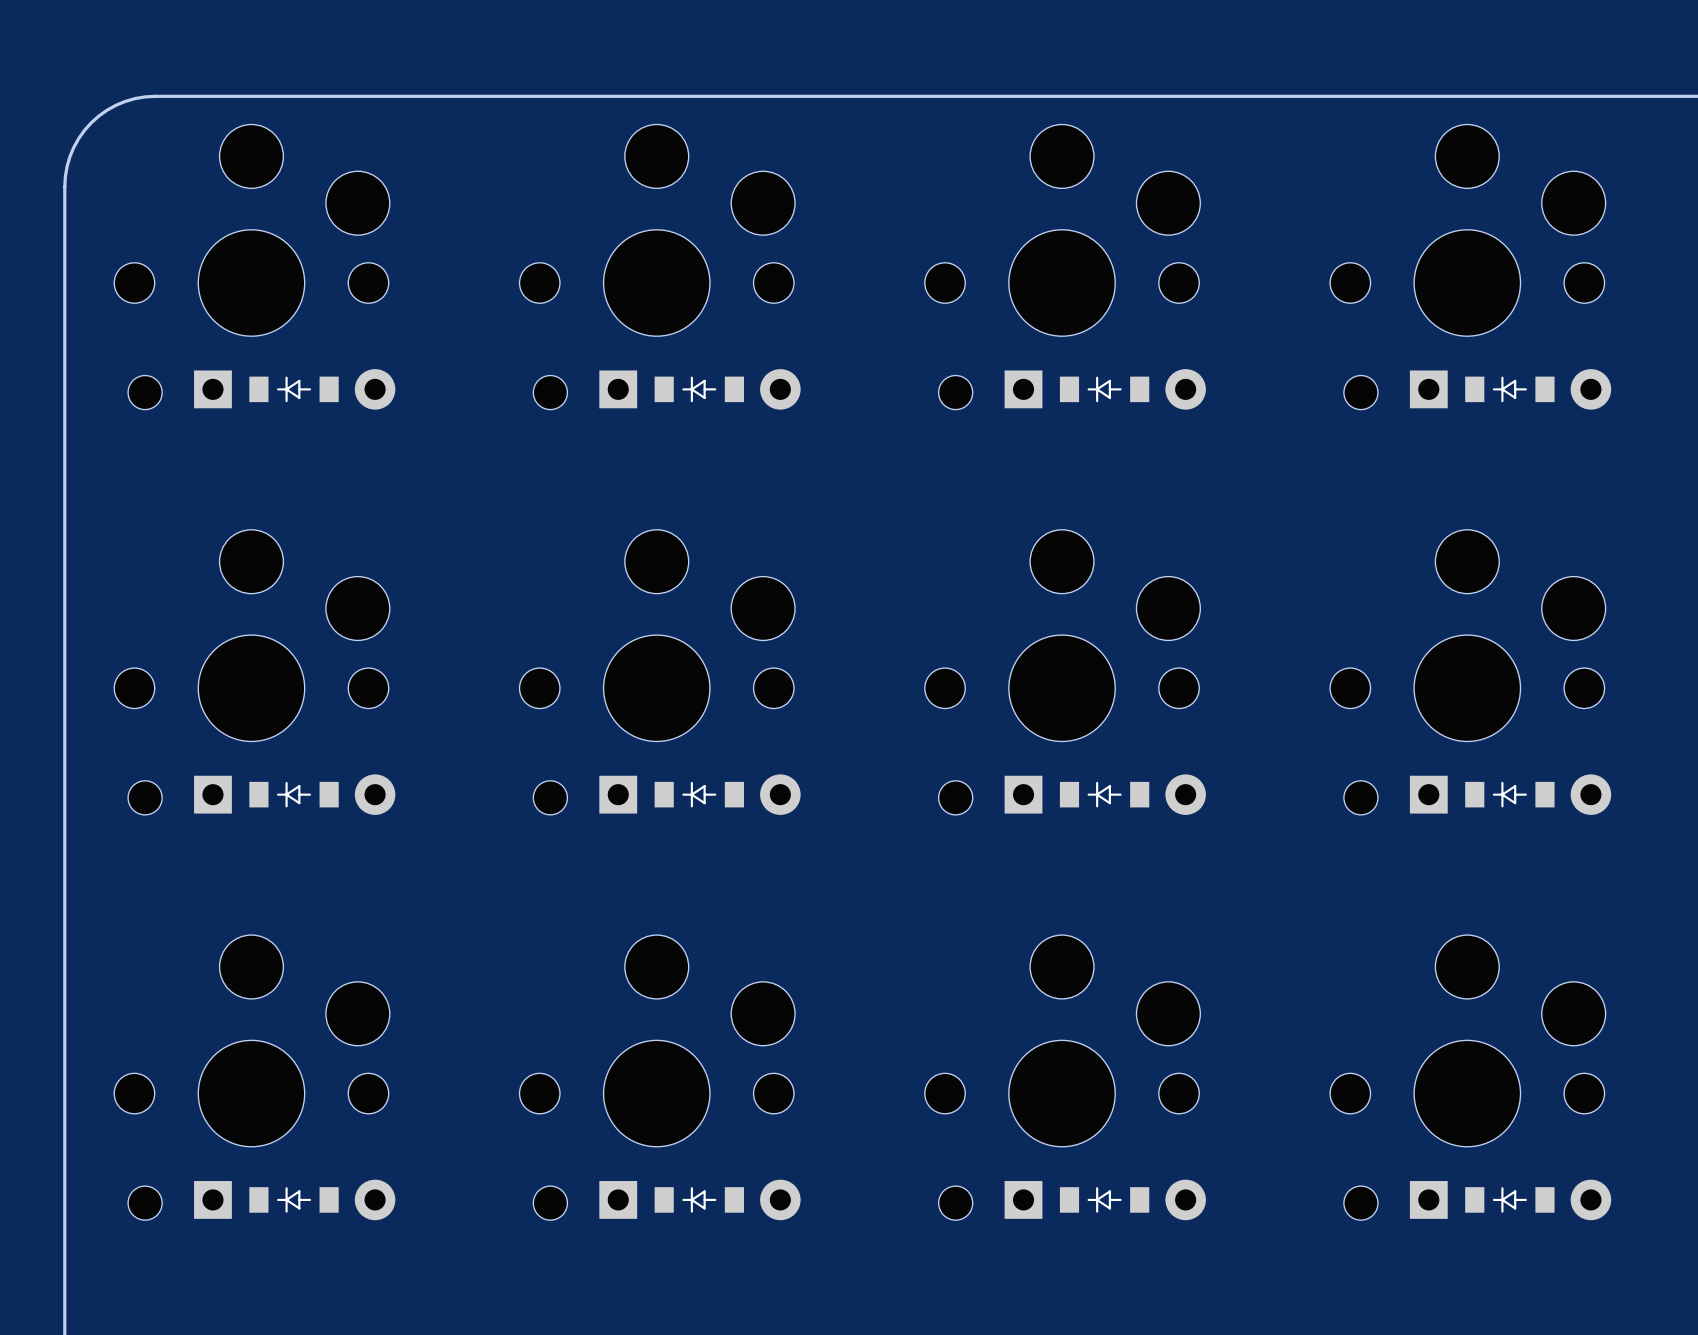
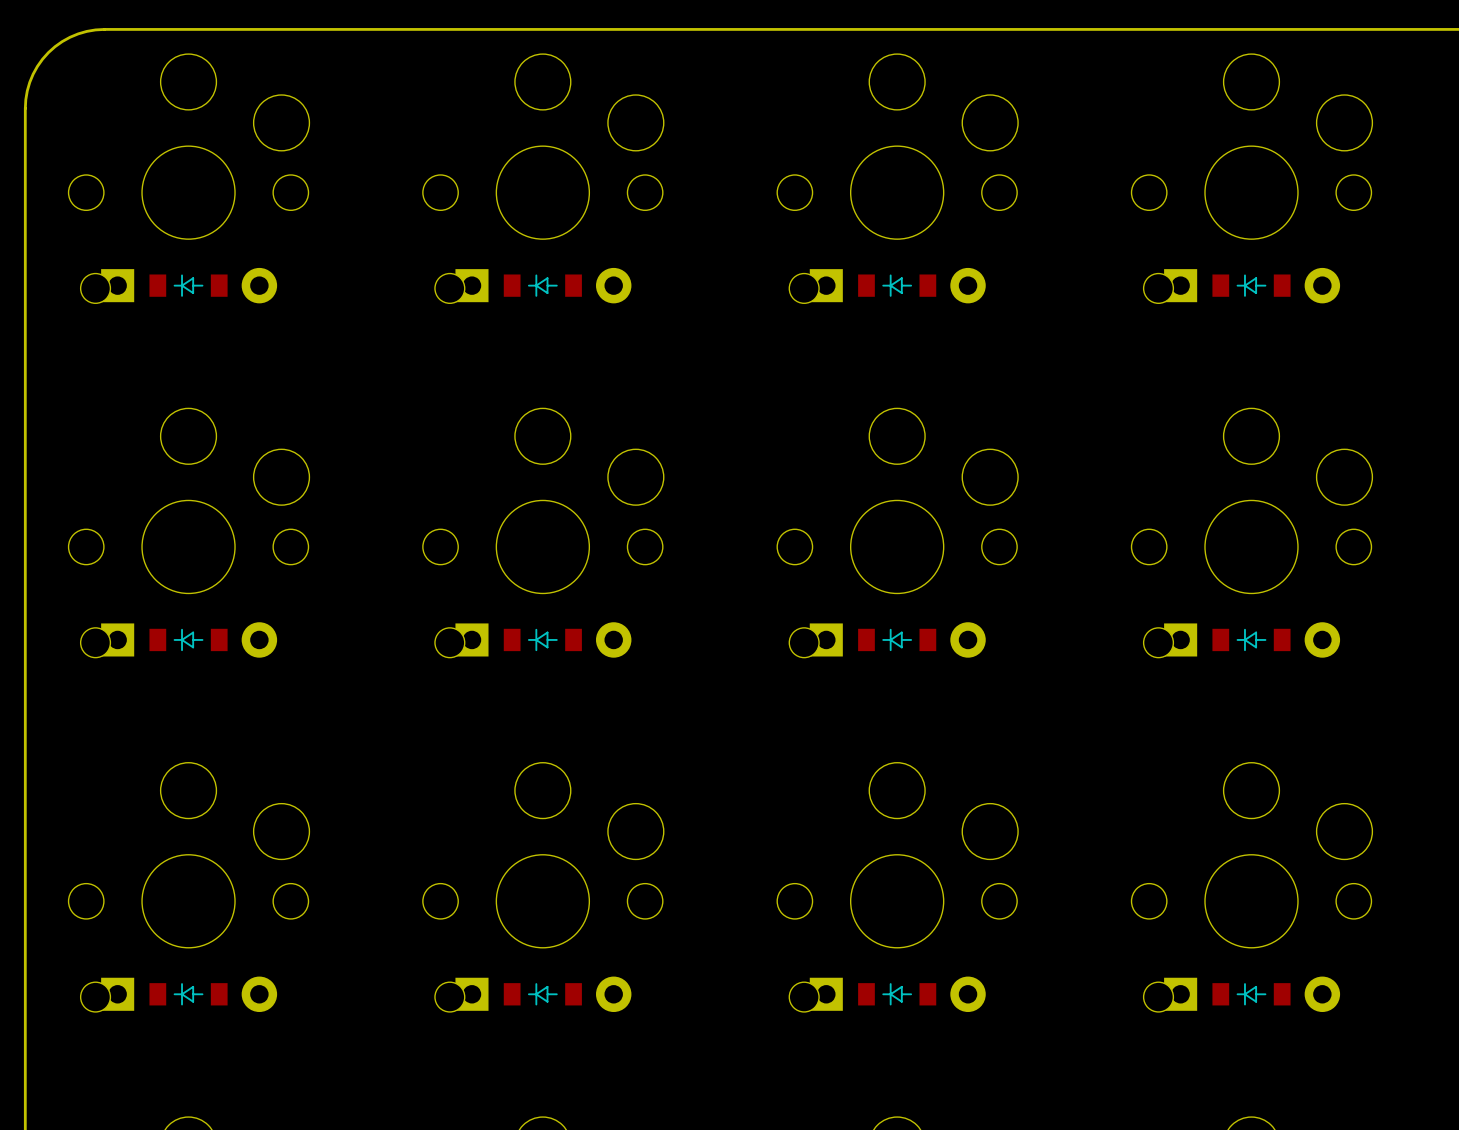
part position: (294, 389) -> (189, 285)
part position: (699, 389) -> (543, 285)
part position: (1105, 389) -> (897, 285)
part position: (1510, 389) -> (1252, 285)
part position: (294, 794) -> (189, 639)
part position: (699, 794) -> (543, 639)
part position: (1105, 794) -> (897, 639)
part position: (1510, 794) -> (1252, 639)
part position: (294, 1199) -> (189, 994)
part position: (699, 1199) -> (543, 994)
part position: (1105, 1199) -> (897, 994)
part position: (1510, 1199) -> (1252, 994)

